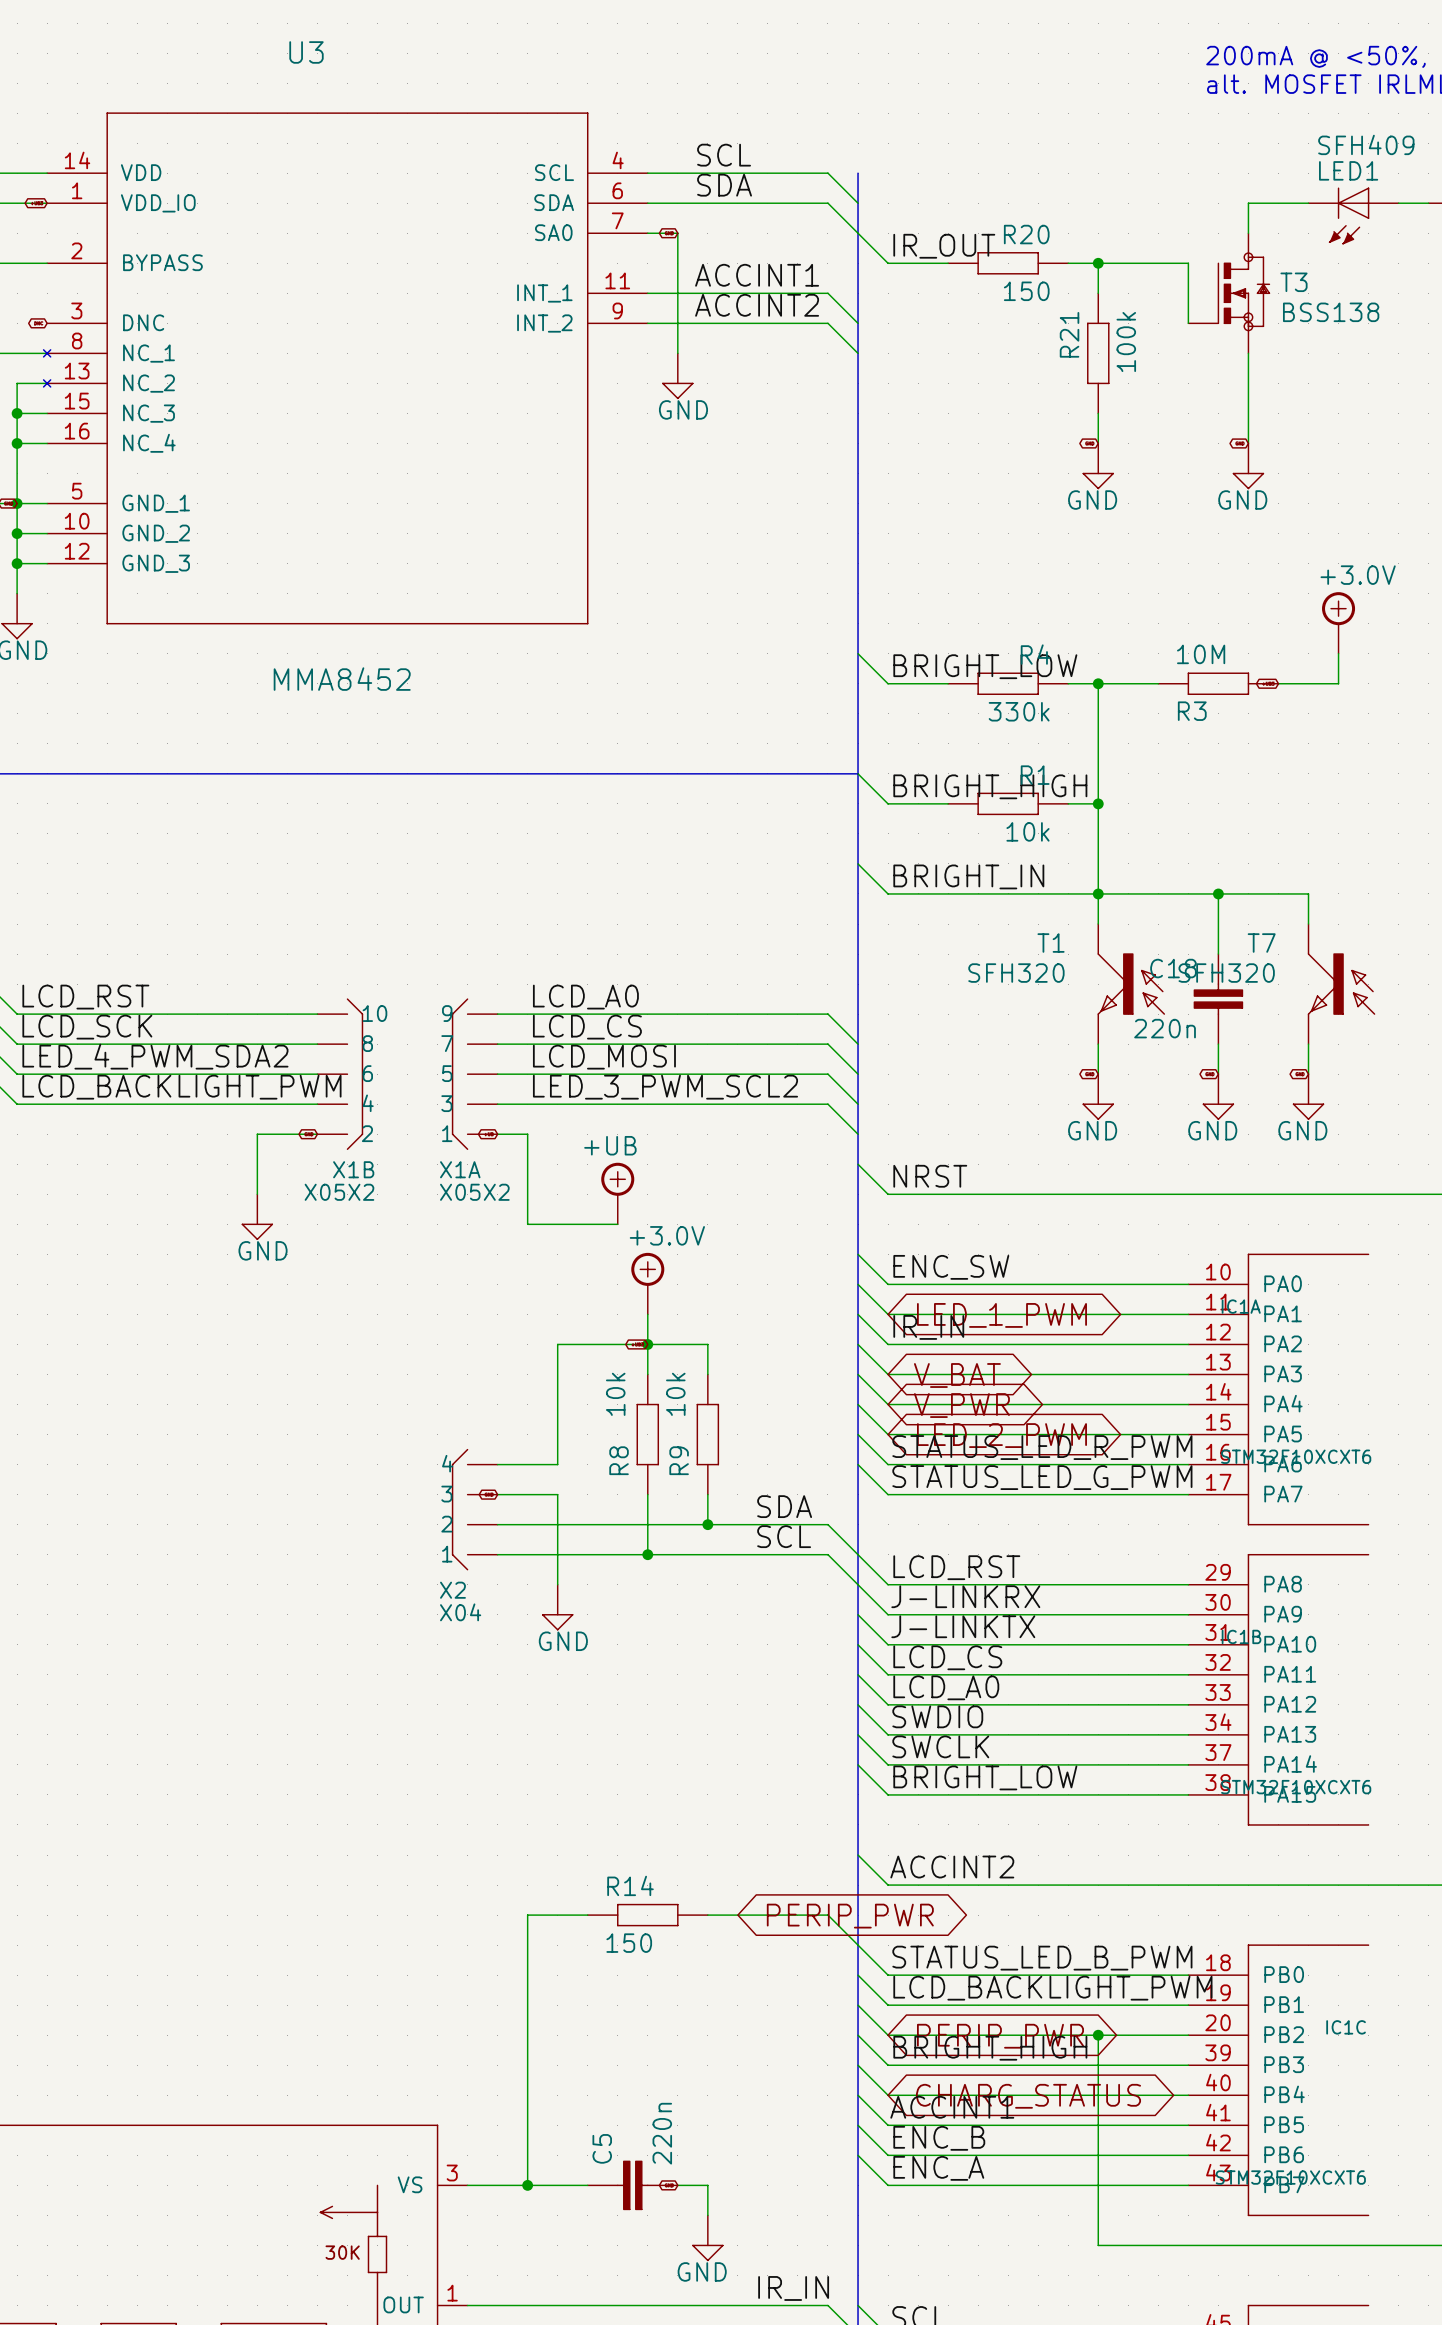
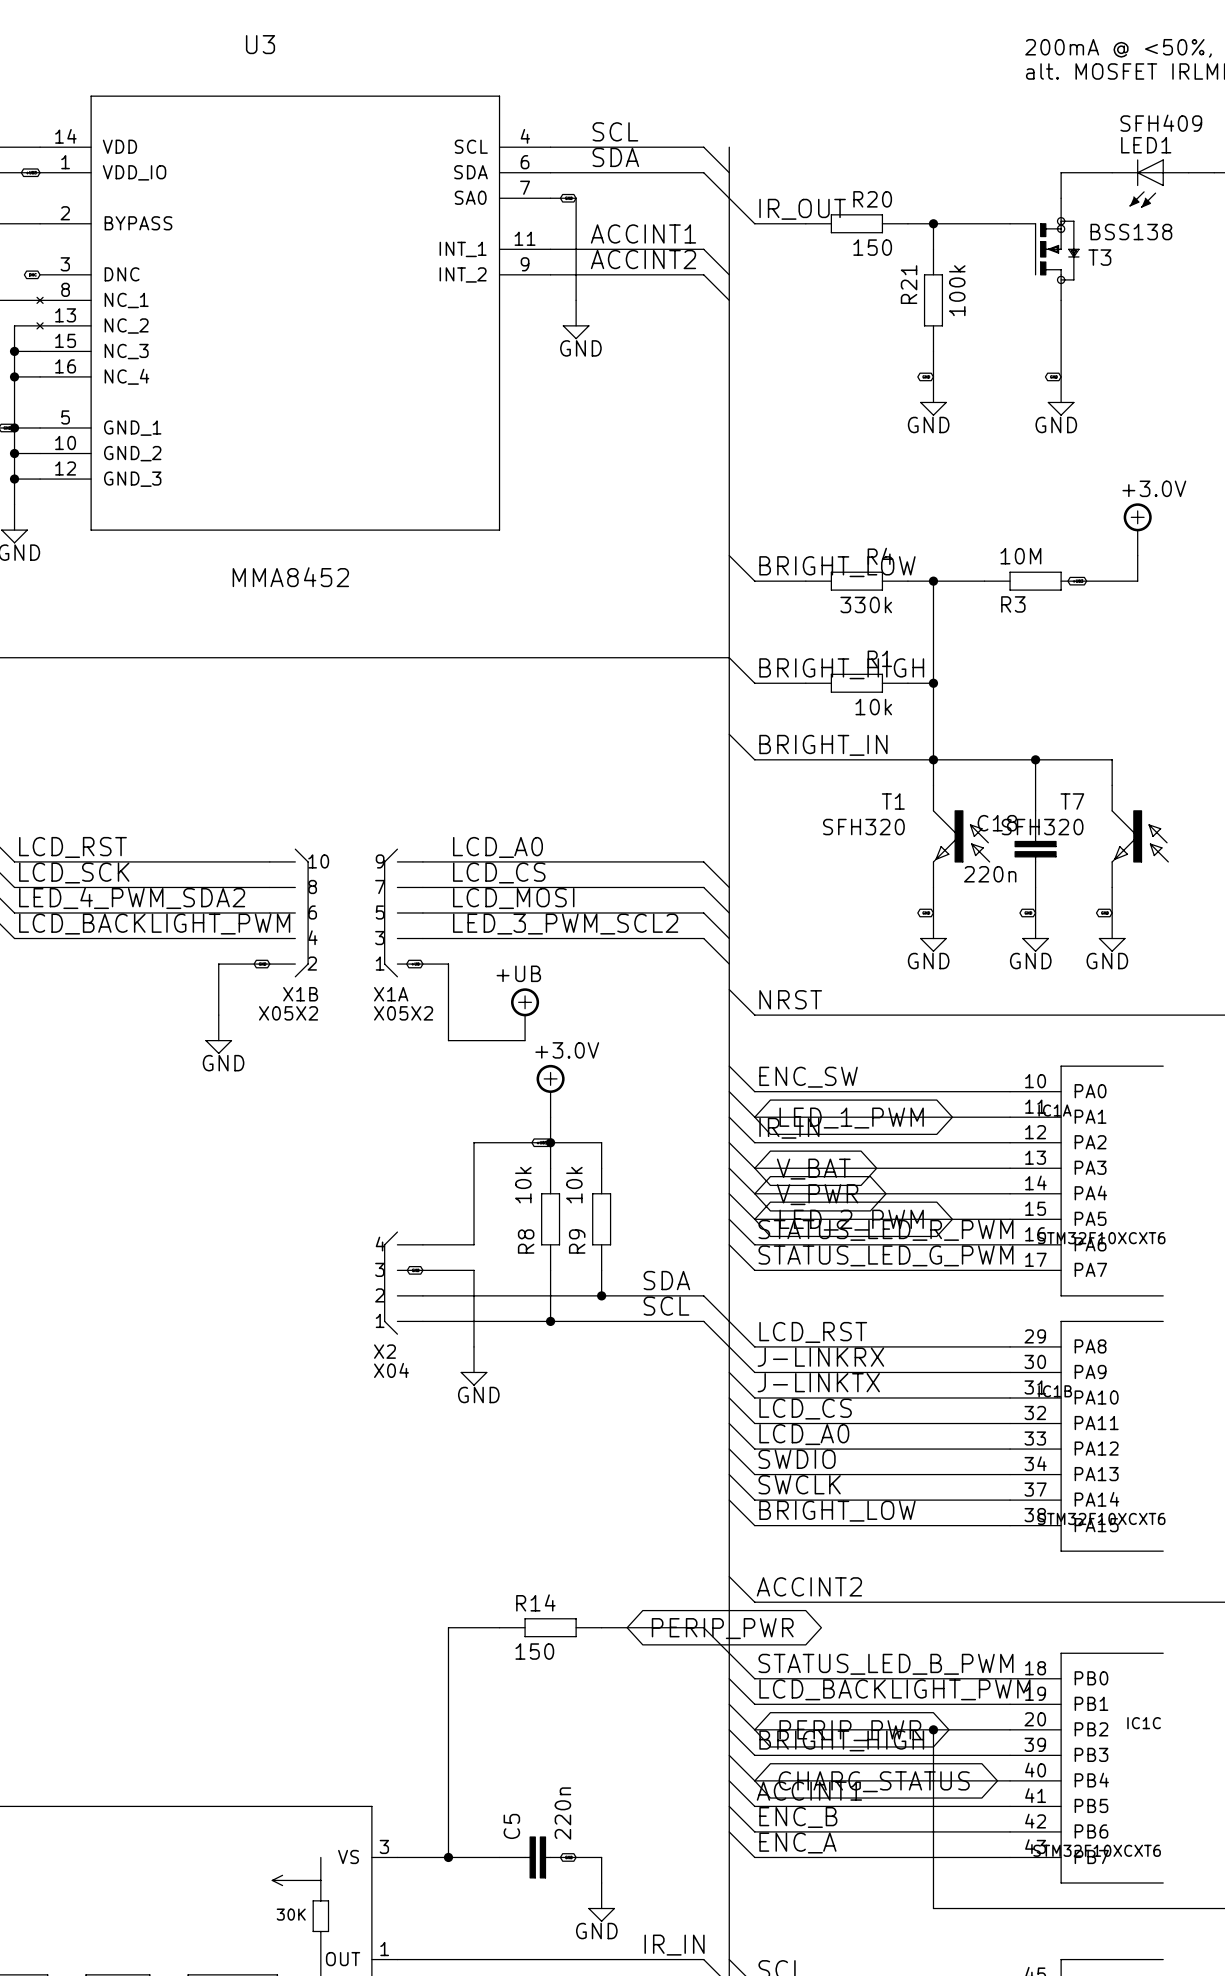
wire: (1188, 263) (1188, 323) -> none
T3 flip: as is (1243, 291) -> up-down (1057, 250)

